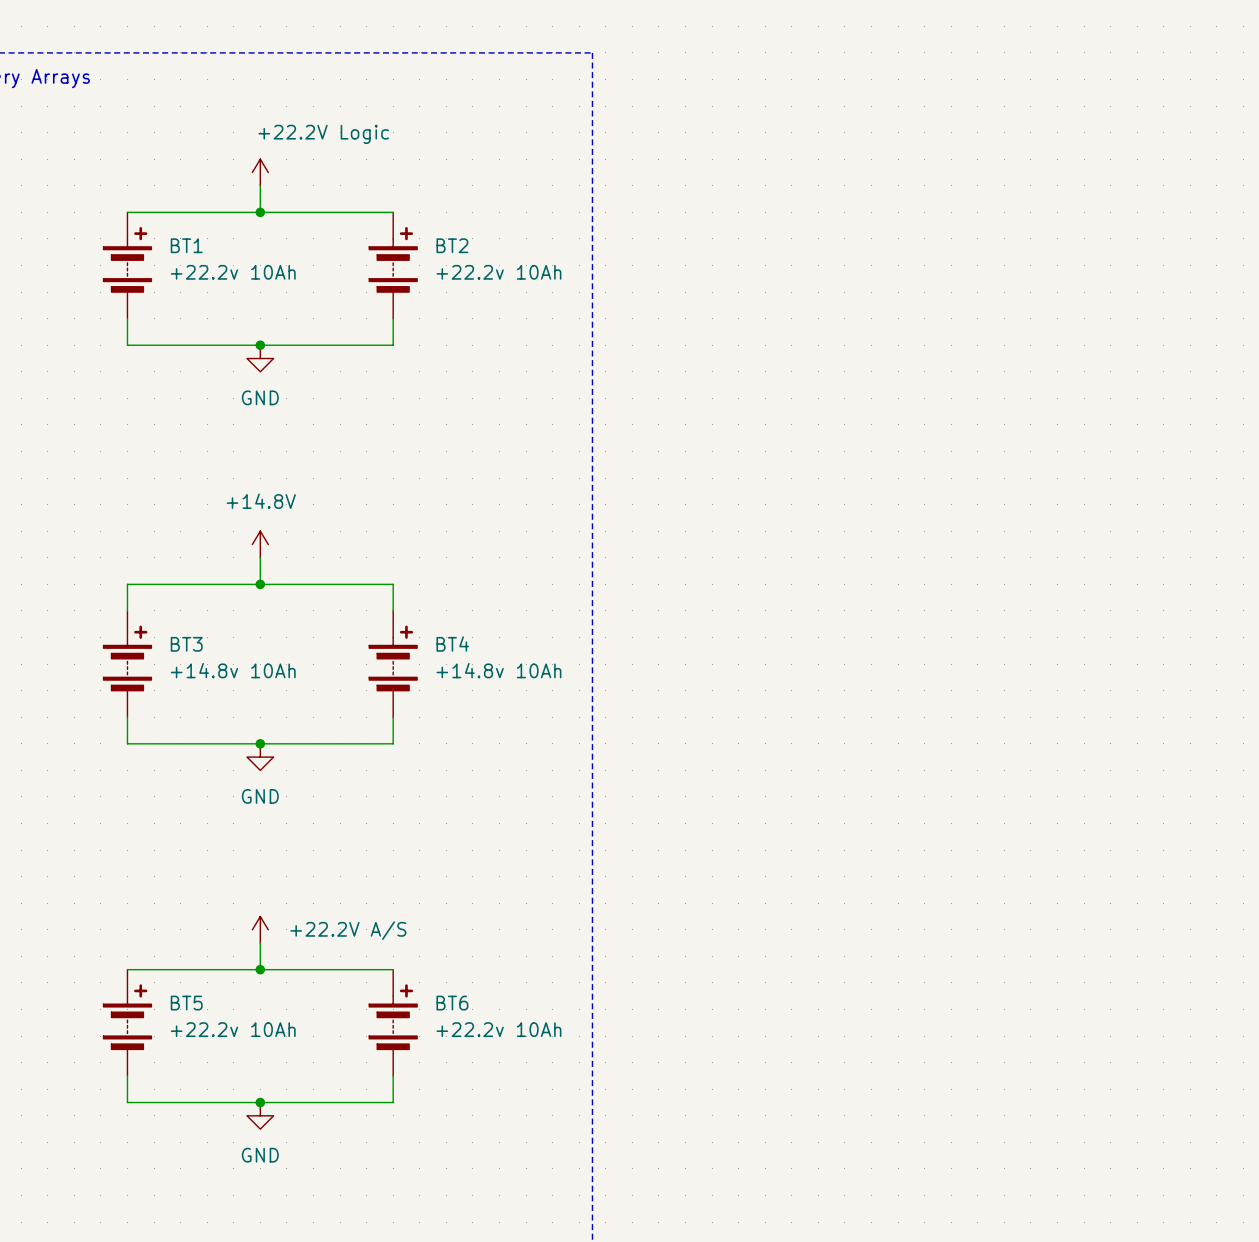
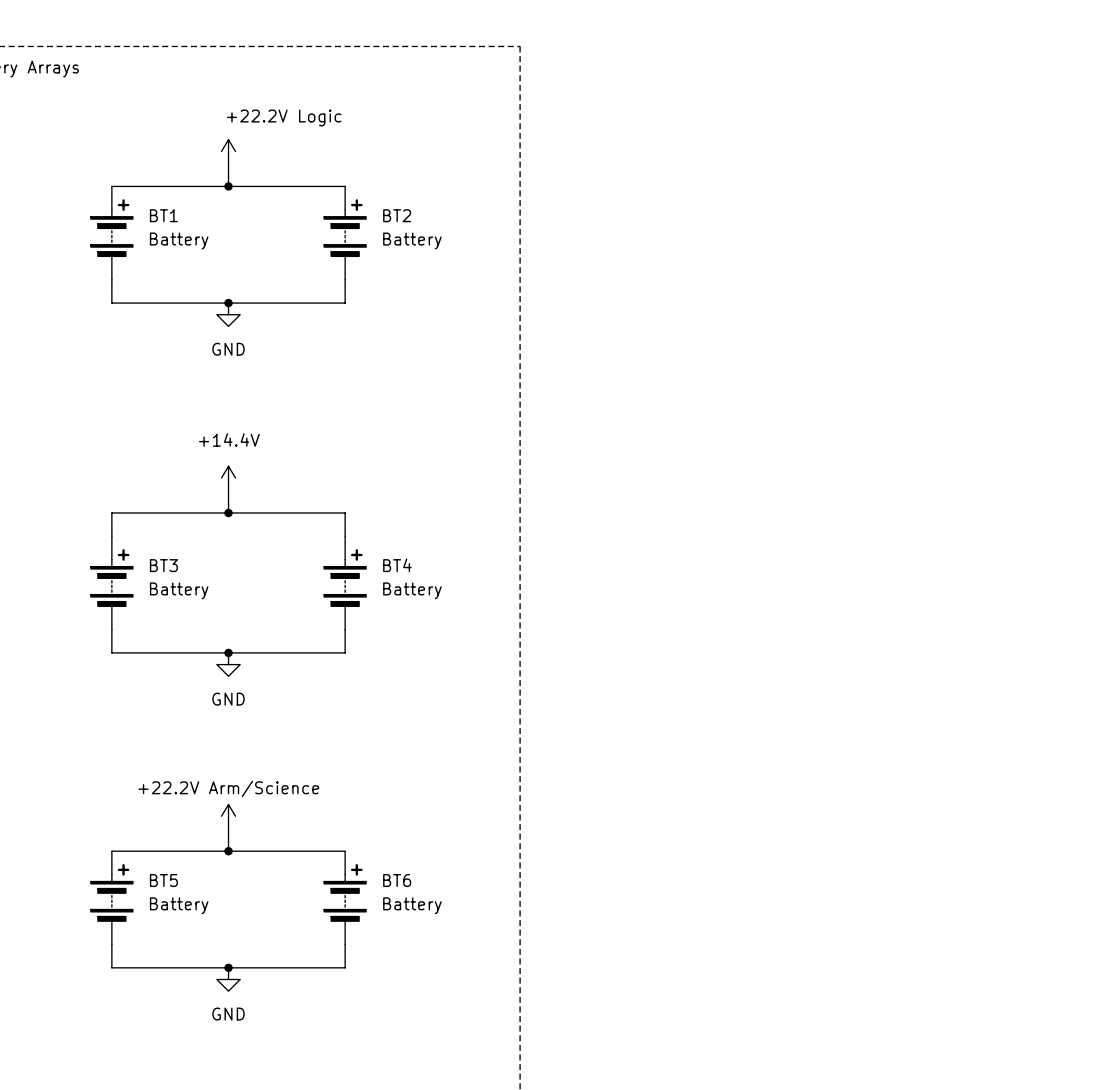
BT1 value: +22.2v 10Ah (233, 272) -> Battery (179, 240)
BT2 value: +22.2v 10Ah (498, 272) -> Battery (412, 240)
power symbol: +14.8V (260, 544) -> +14.4V (228, 477)
BT3 value: +14.8v 10Ah (233, 670) -> Battery (179, 590)
BT4 value: +14.8v 10Ah (498, 670) -> Battery (412, 590)
power symbol: +22.2V A/S (260, 929) -> +22.2V Arm/Science (228, 816)
BT5 value: +22.2v 10Ah (233, 1029) -> Battery (179, 905)
BT6 value: +22.2v 10Ah (498, 1029) -> Battery (412, 905)

